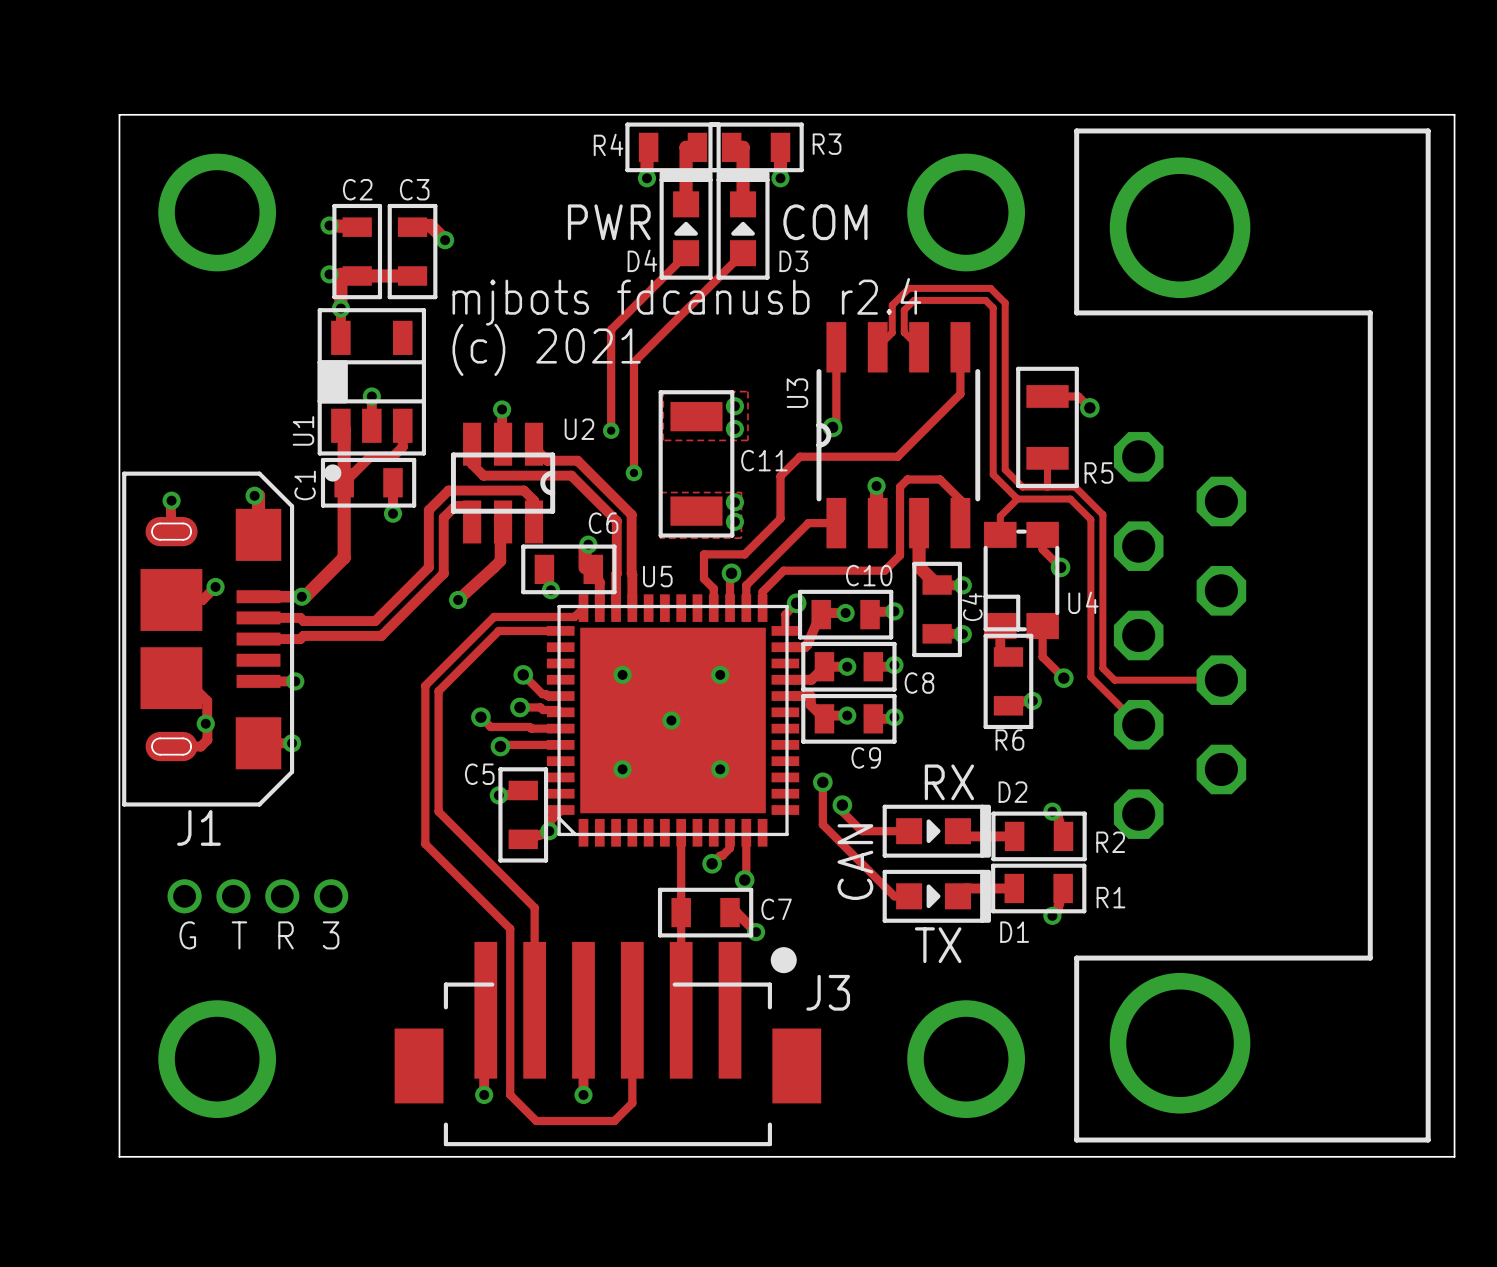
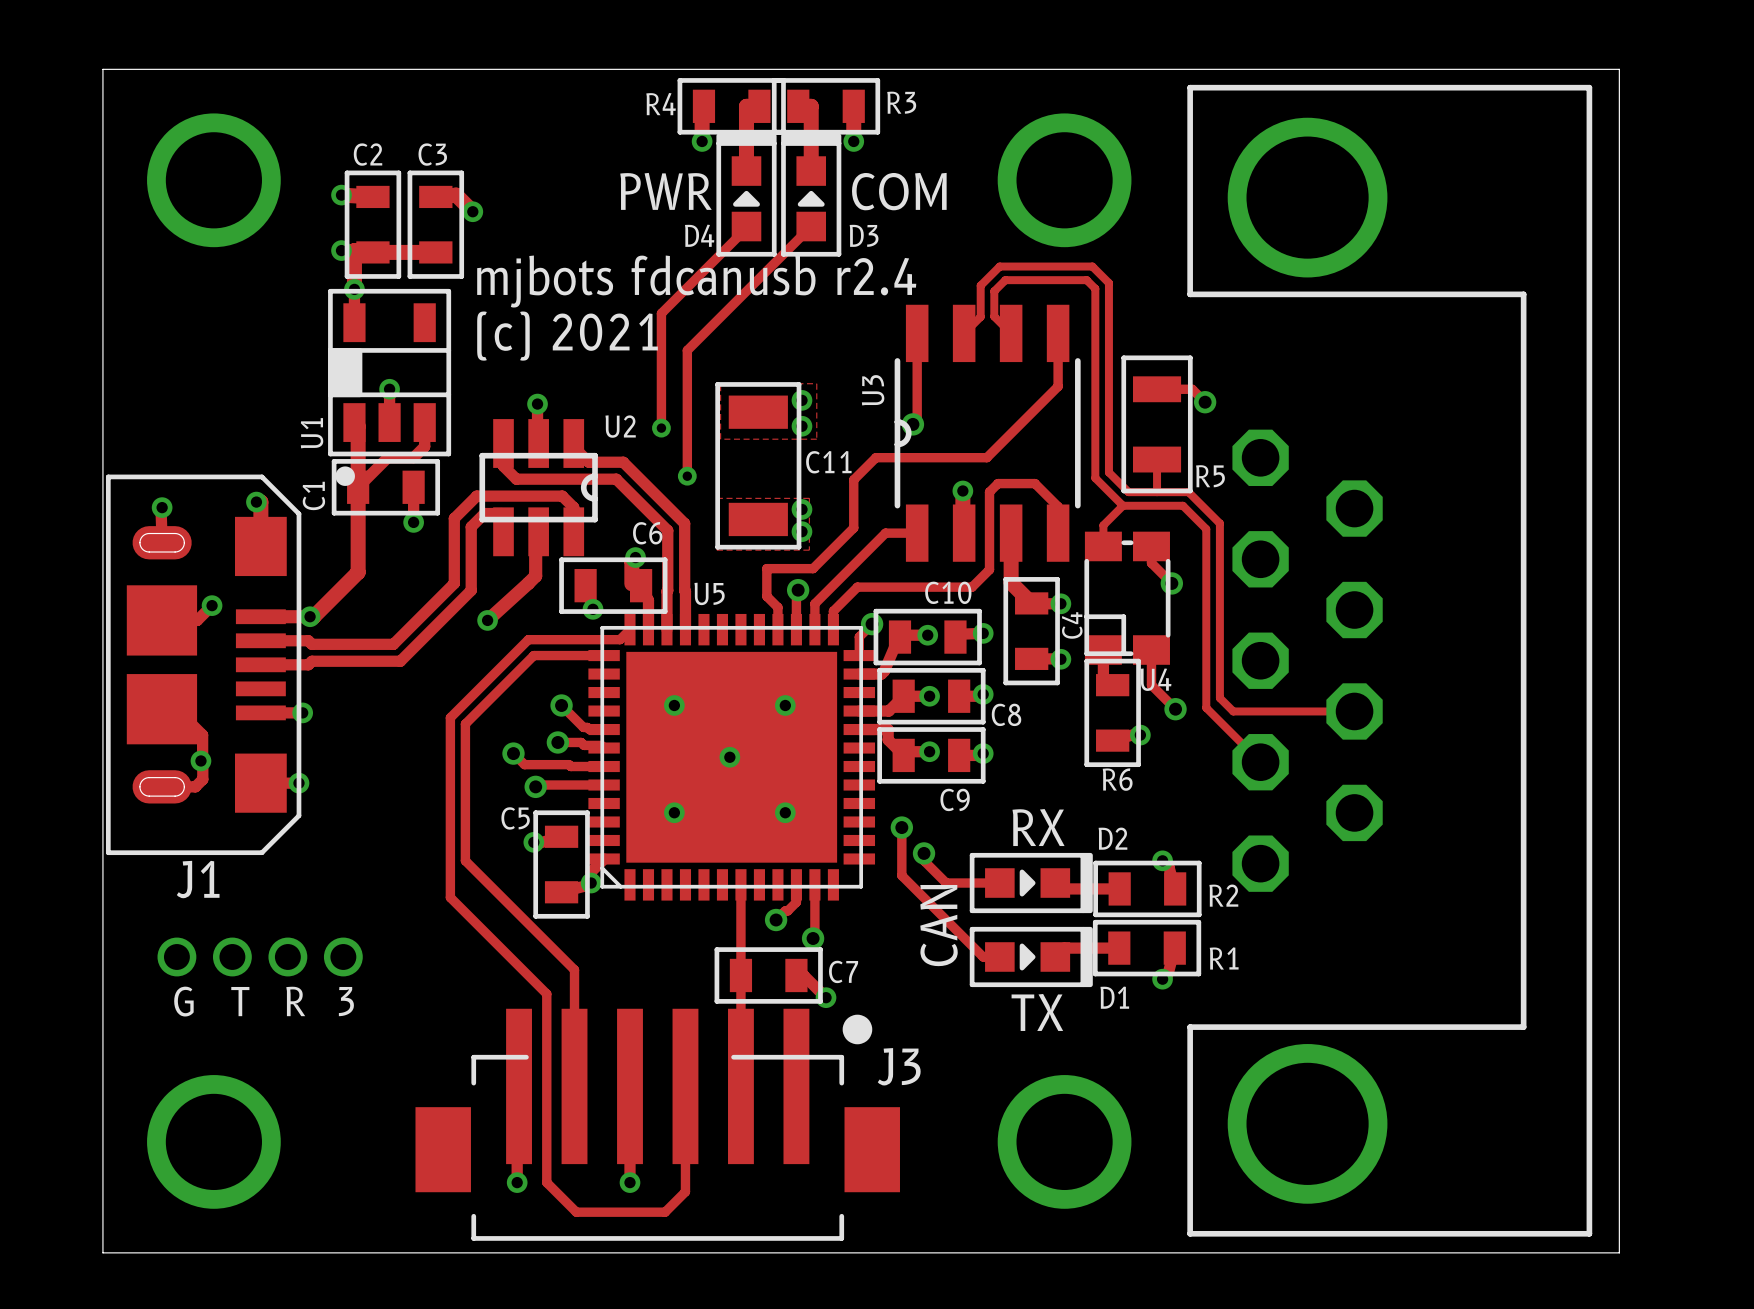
U4 name position: U4 (1083, 602) -> U4 (1155, 679)

